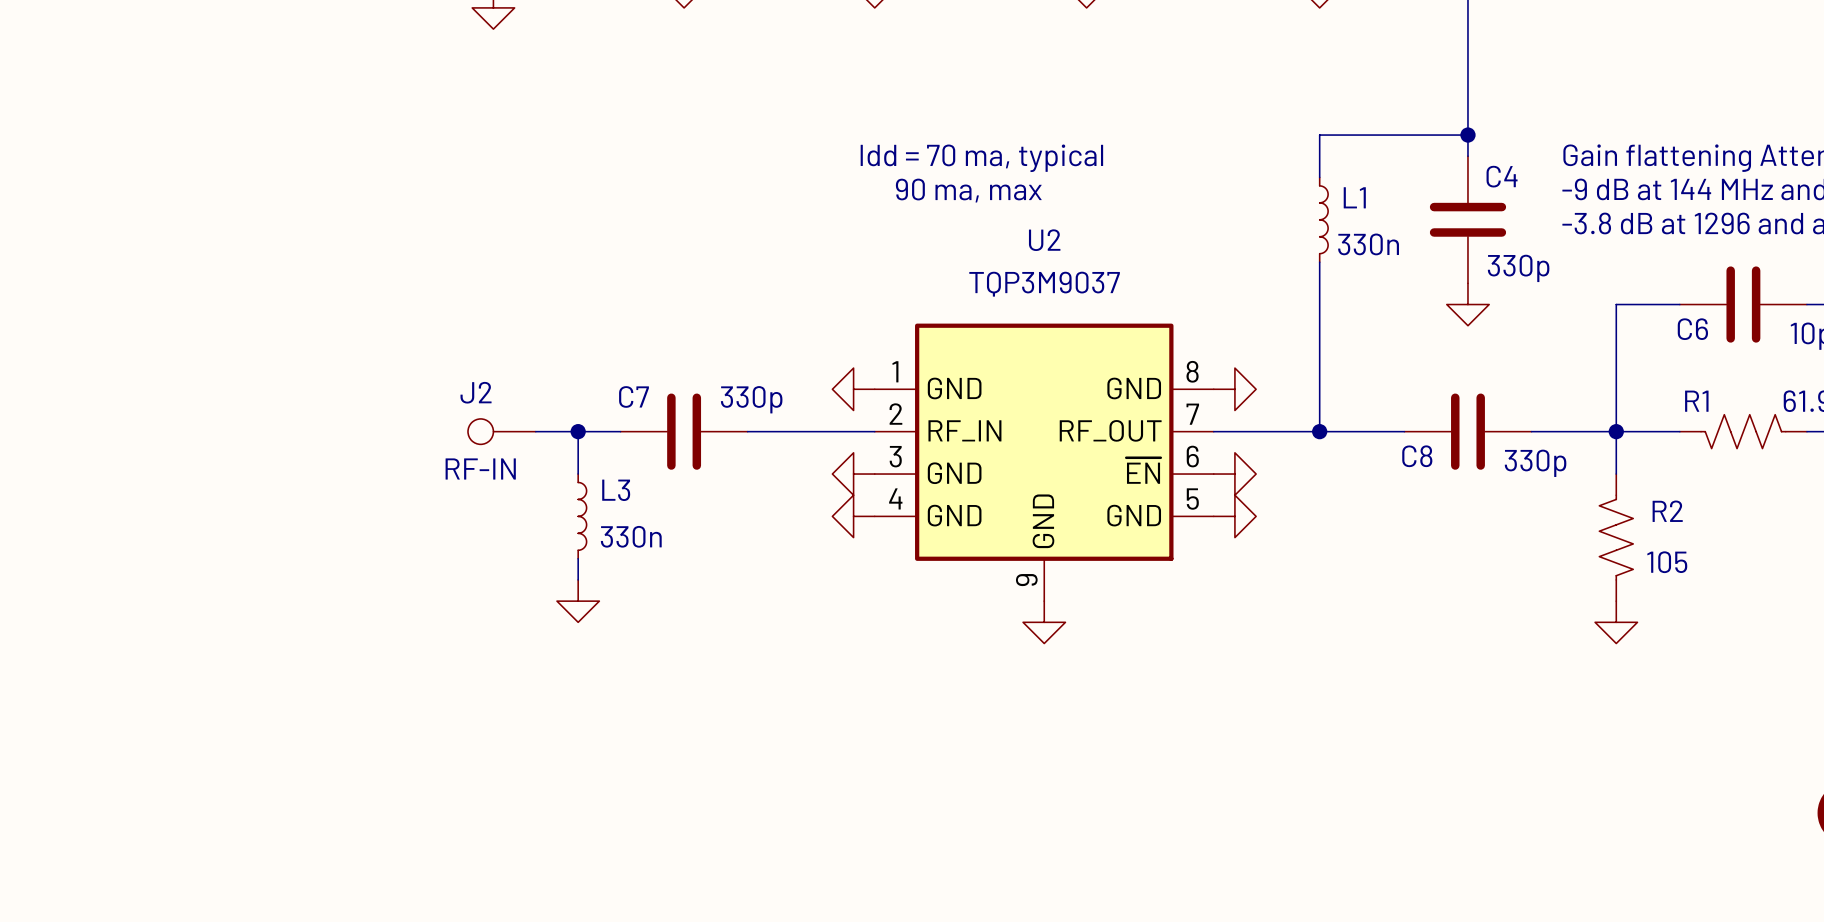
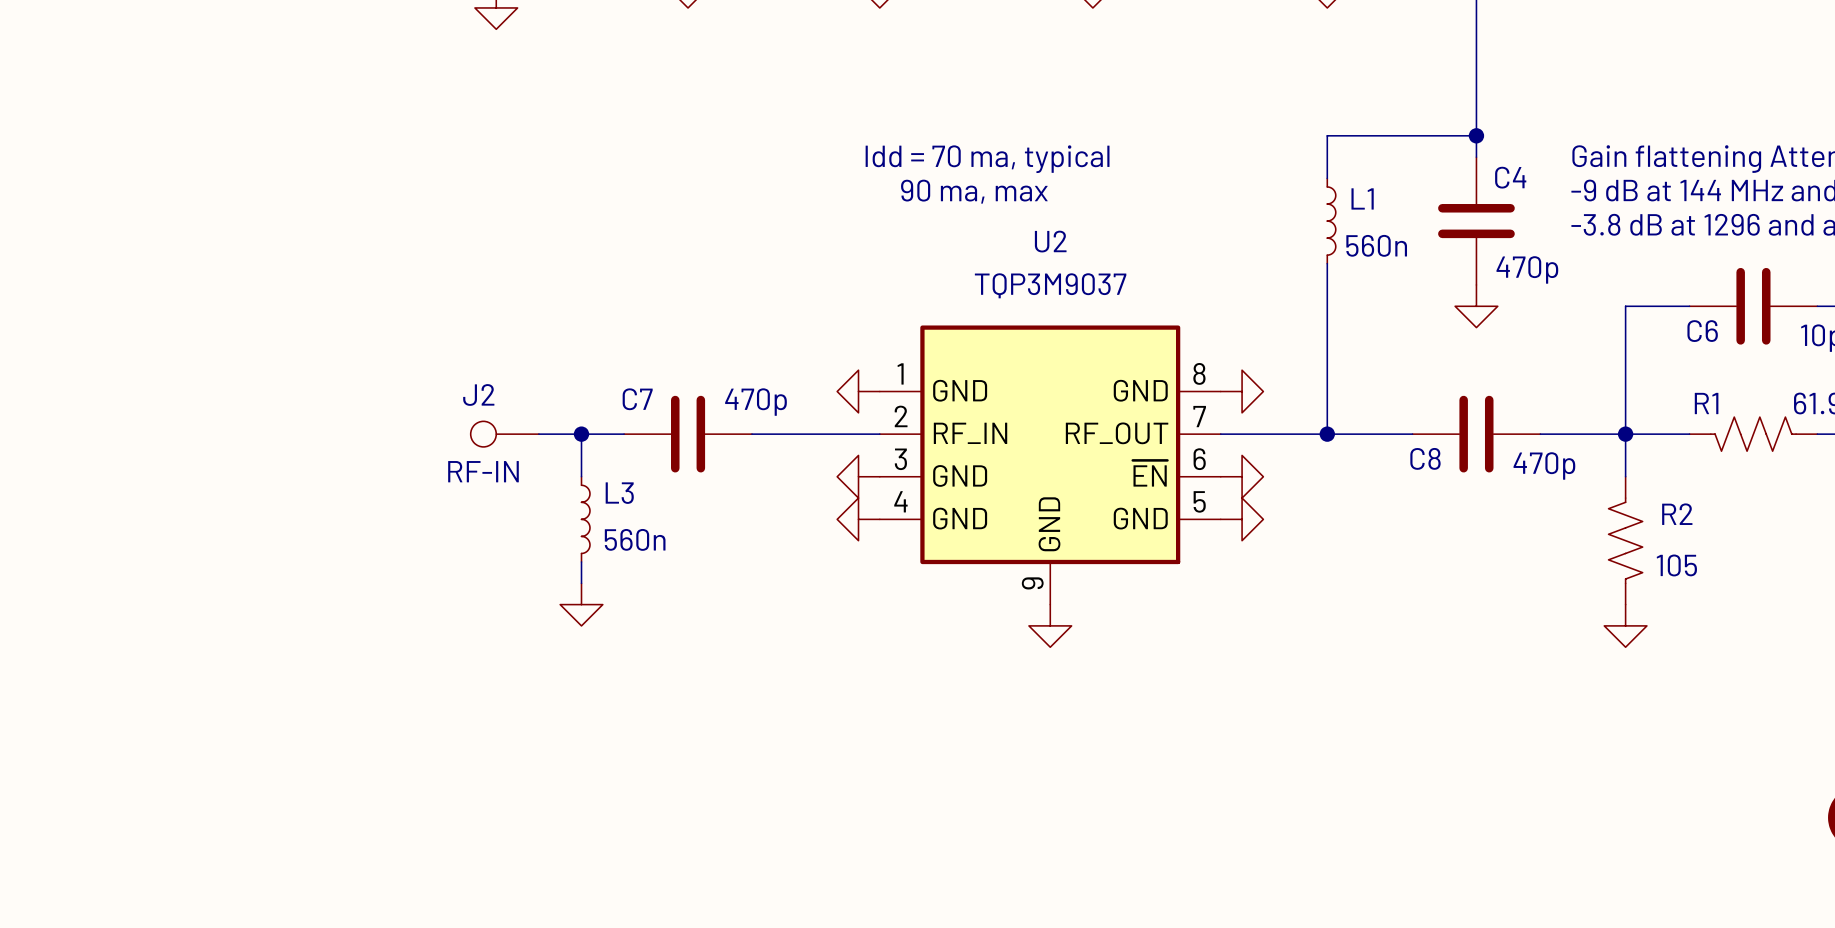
L1 value: 330n (1368, 244) -> 560n (1376, 245)
C4 value: 330p (1518, 268) -> 470p (1527, 269)
C7 value: 330p (751, 399) -> 470p (756, 402)
C8 value: 330p (1535, 463) -> 470p (1544, 465)
L3 value: 330n (631, 536) -> 560n (635, 539)

